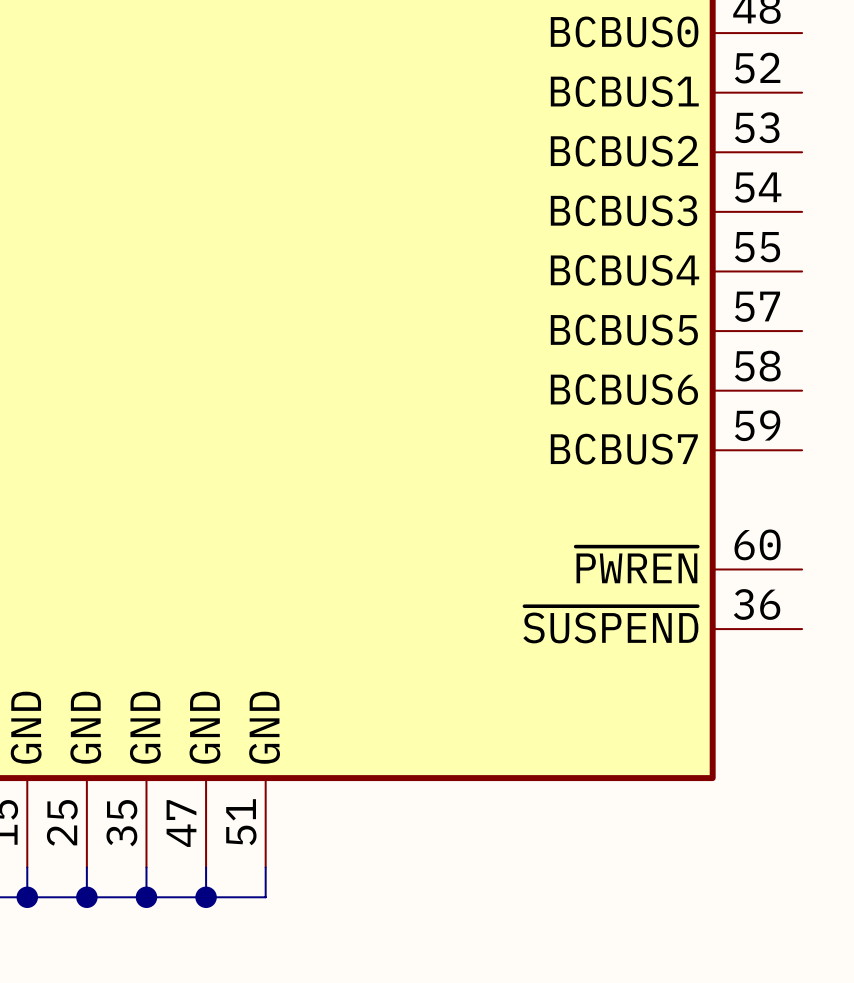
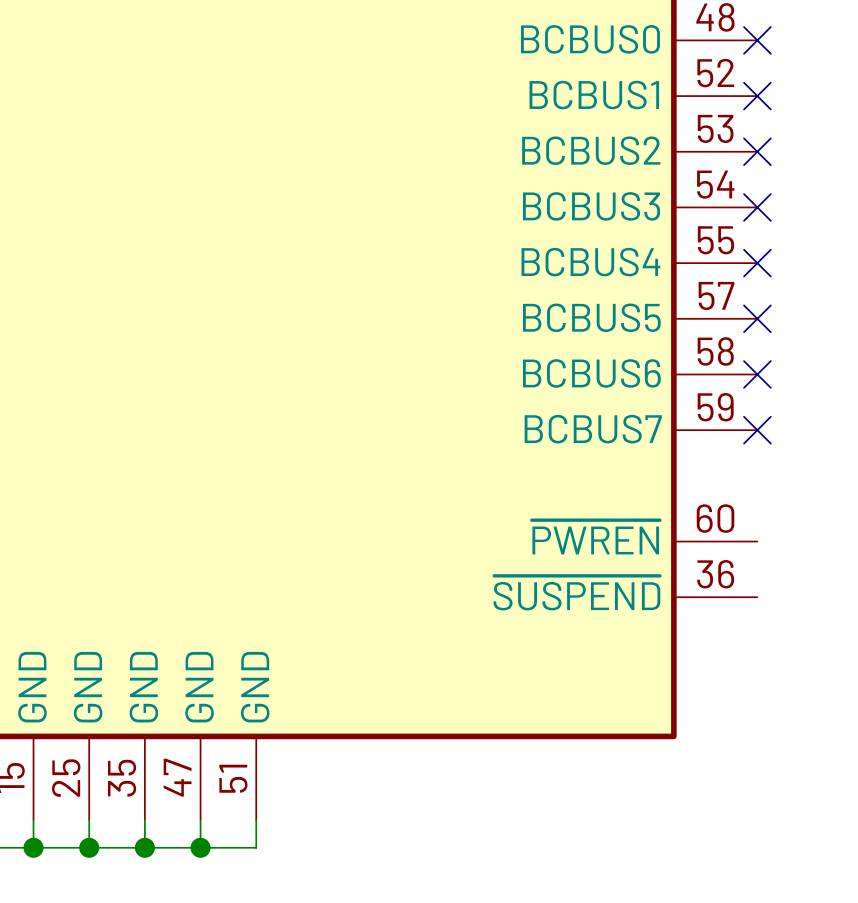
no-connect mark: none -> (757, 40)
no-connect mark: none -> (757, 96)
no-connect mark: none -> (757, 151)
no-connect mark: none -> (757, 207)
no-connect mark: none -> (757, 263)
no-connect mark: none -> (757, 318)
no-connect mark: none -> (757, 374)
no-connect mark: none -> (757, 430)

